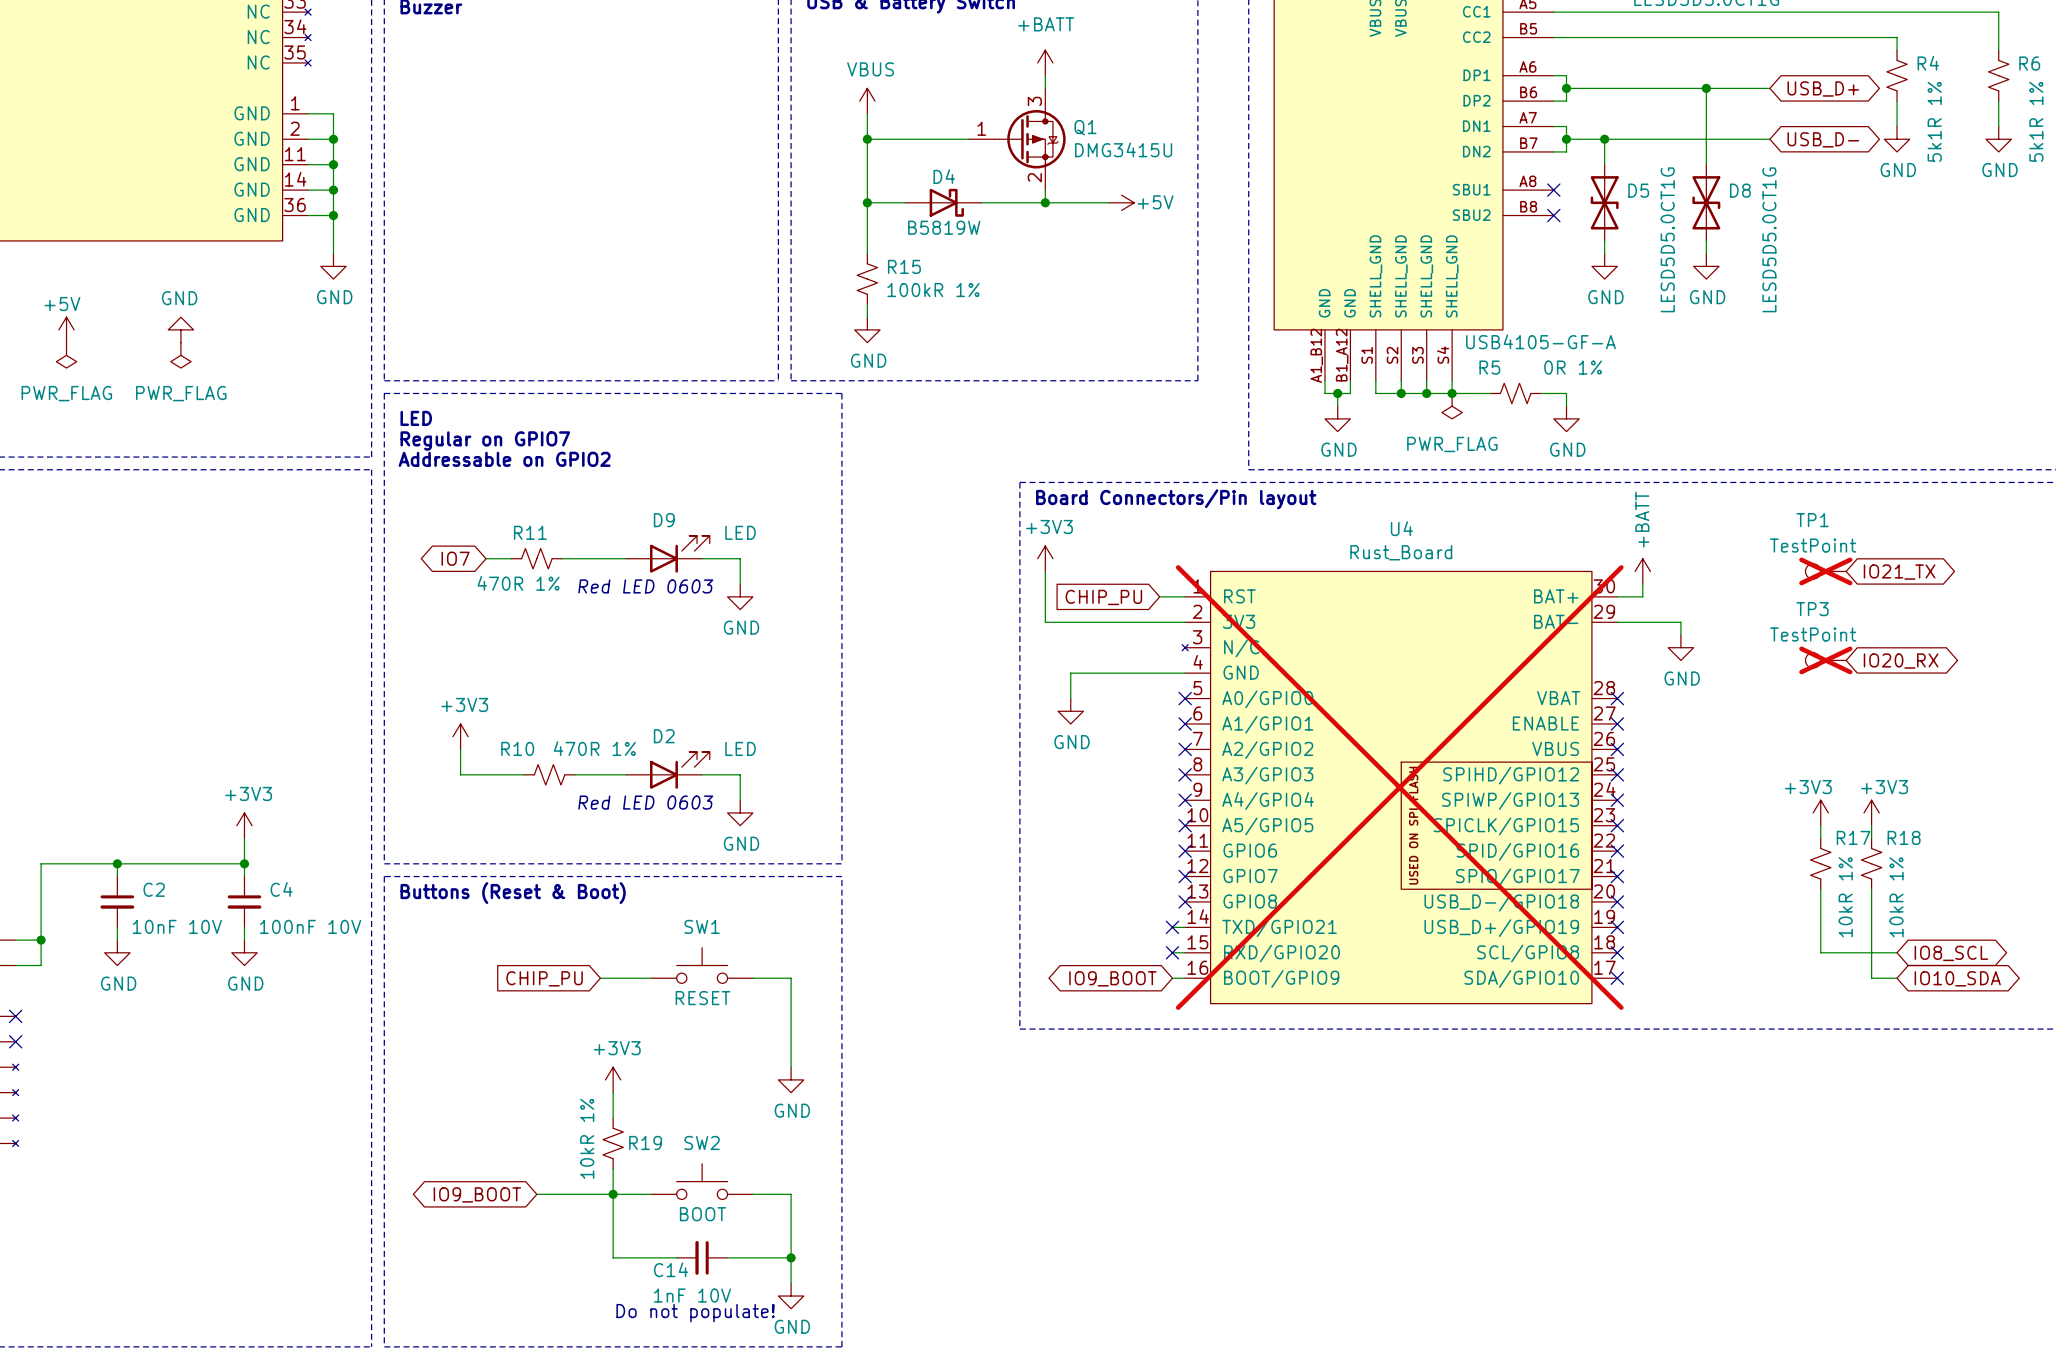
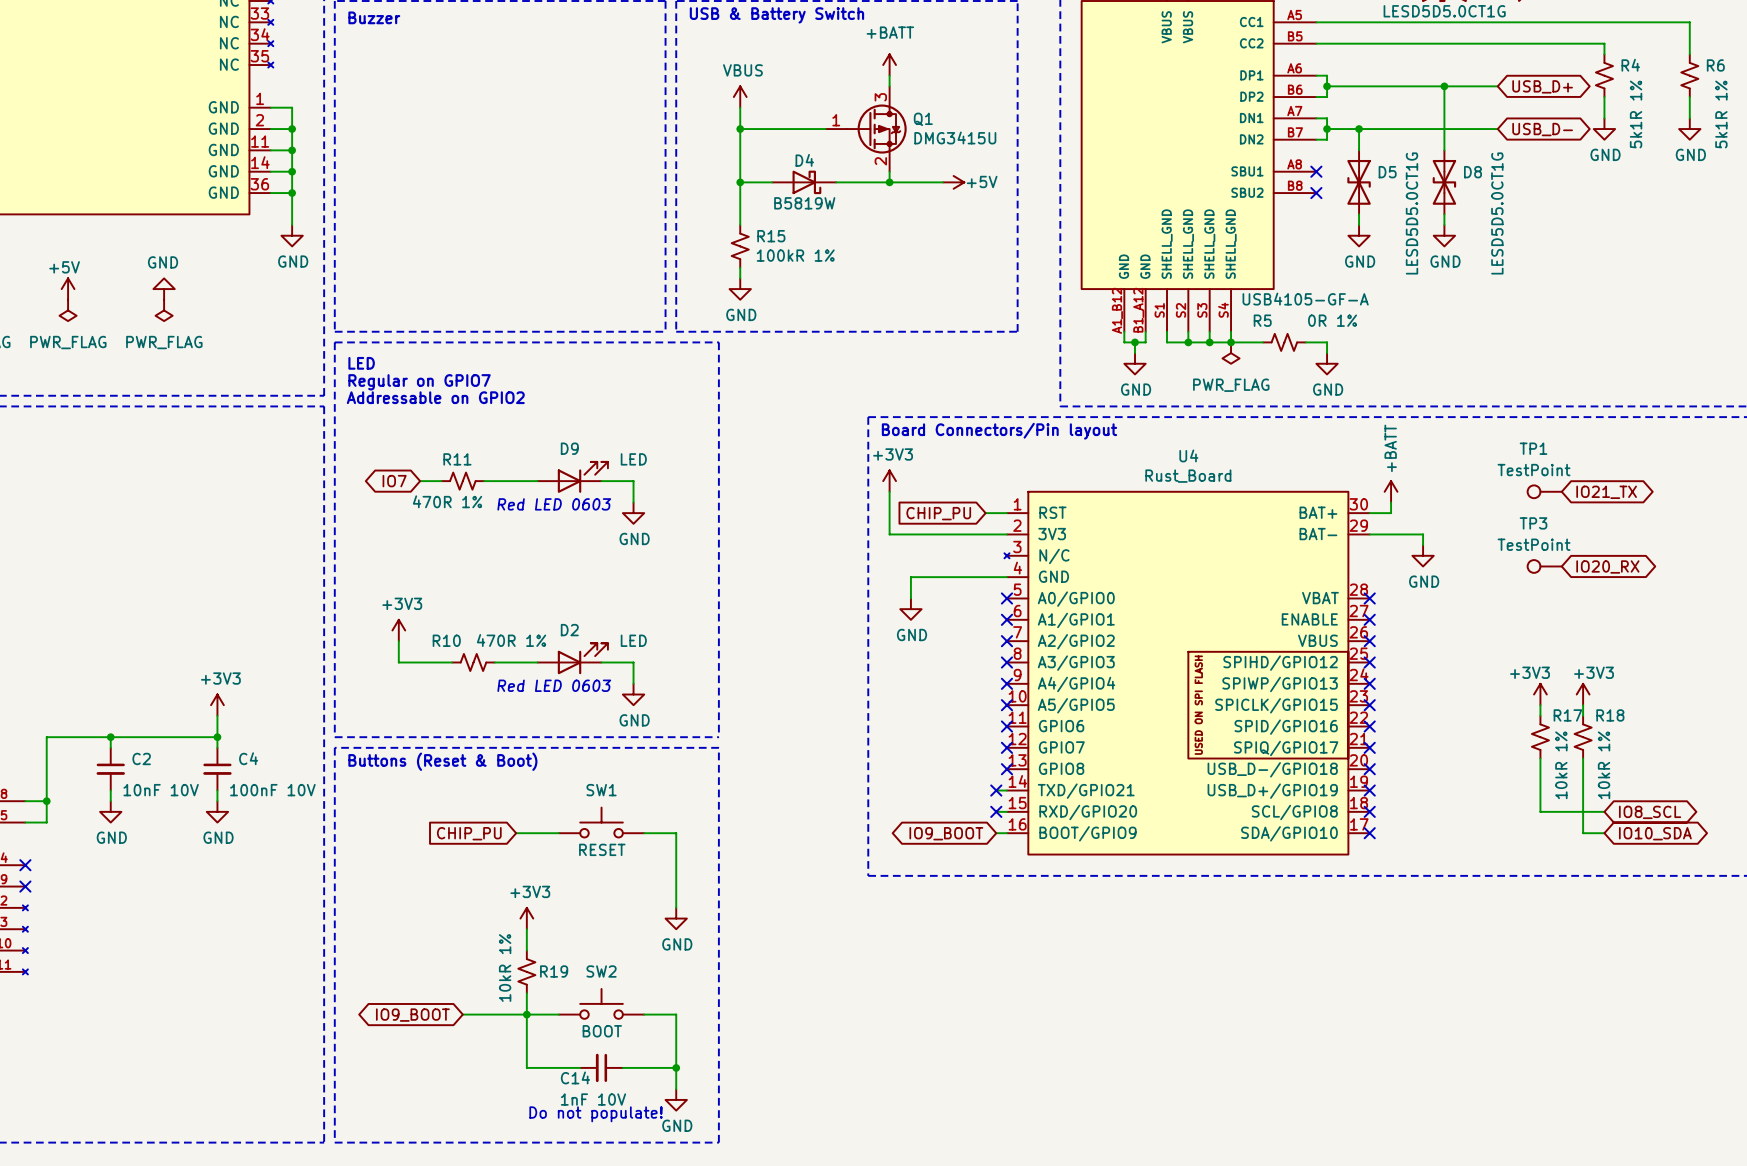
TP1 do-not-place cross: (1825, 571) -> none
TP3 do-not-place cross: (1825, 660) -> none
U4 do-not-place cross: (1399, 787) -> none

